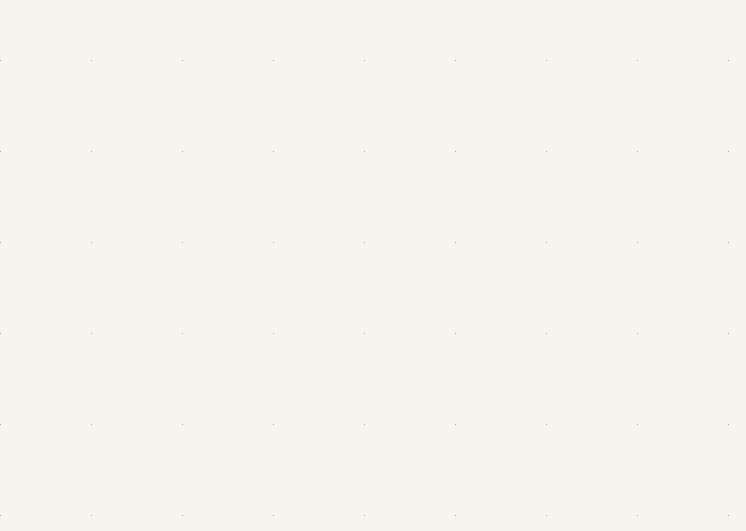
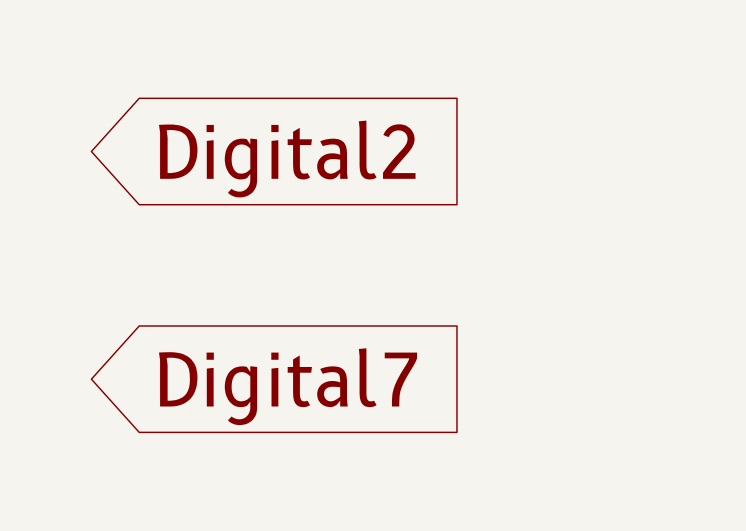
global label: none -> Digital2 (287, 159)
global label: none -> Digital7 (288, 386)

